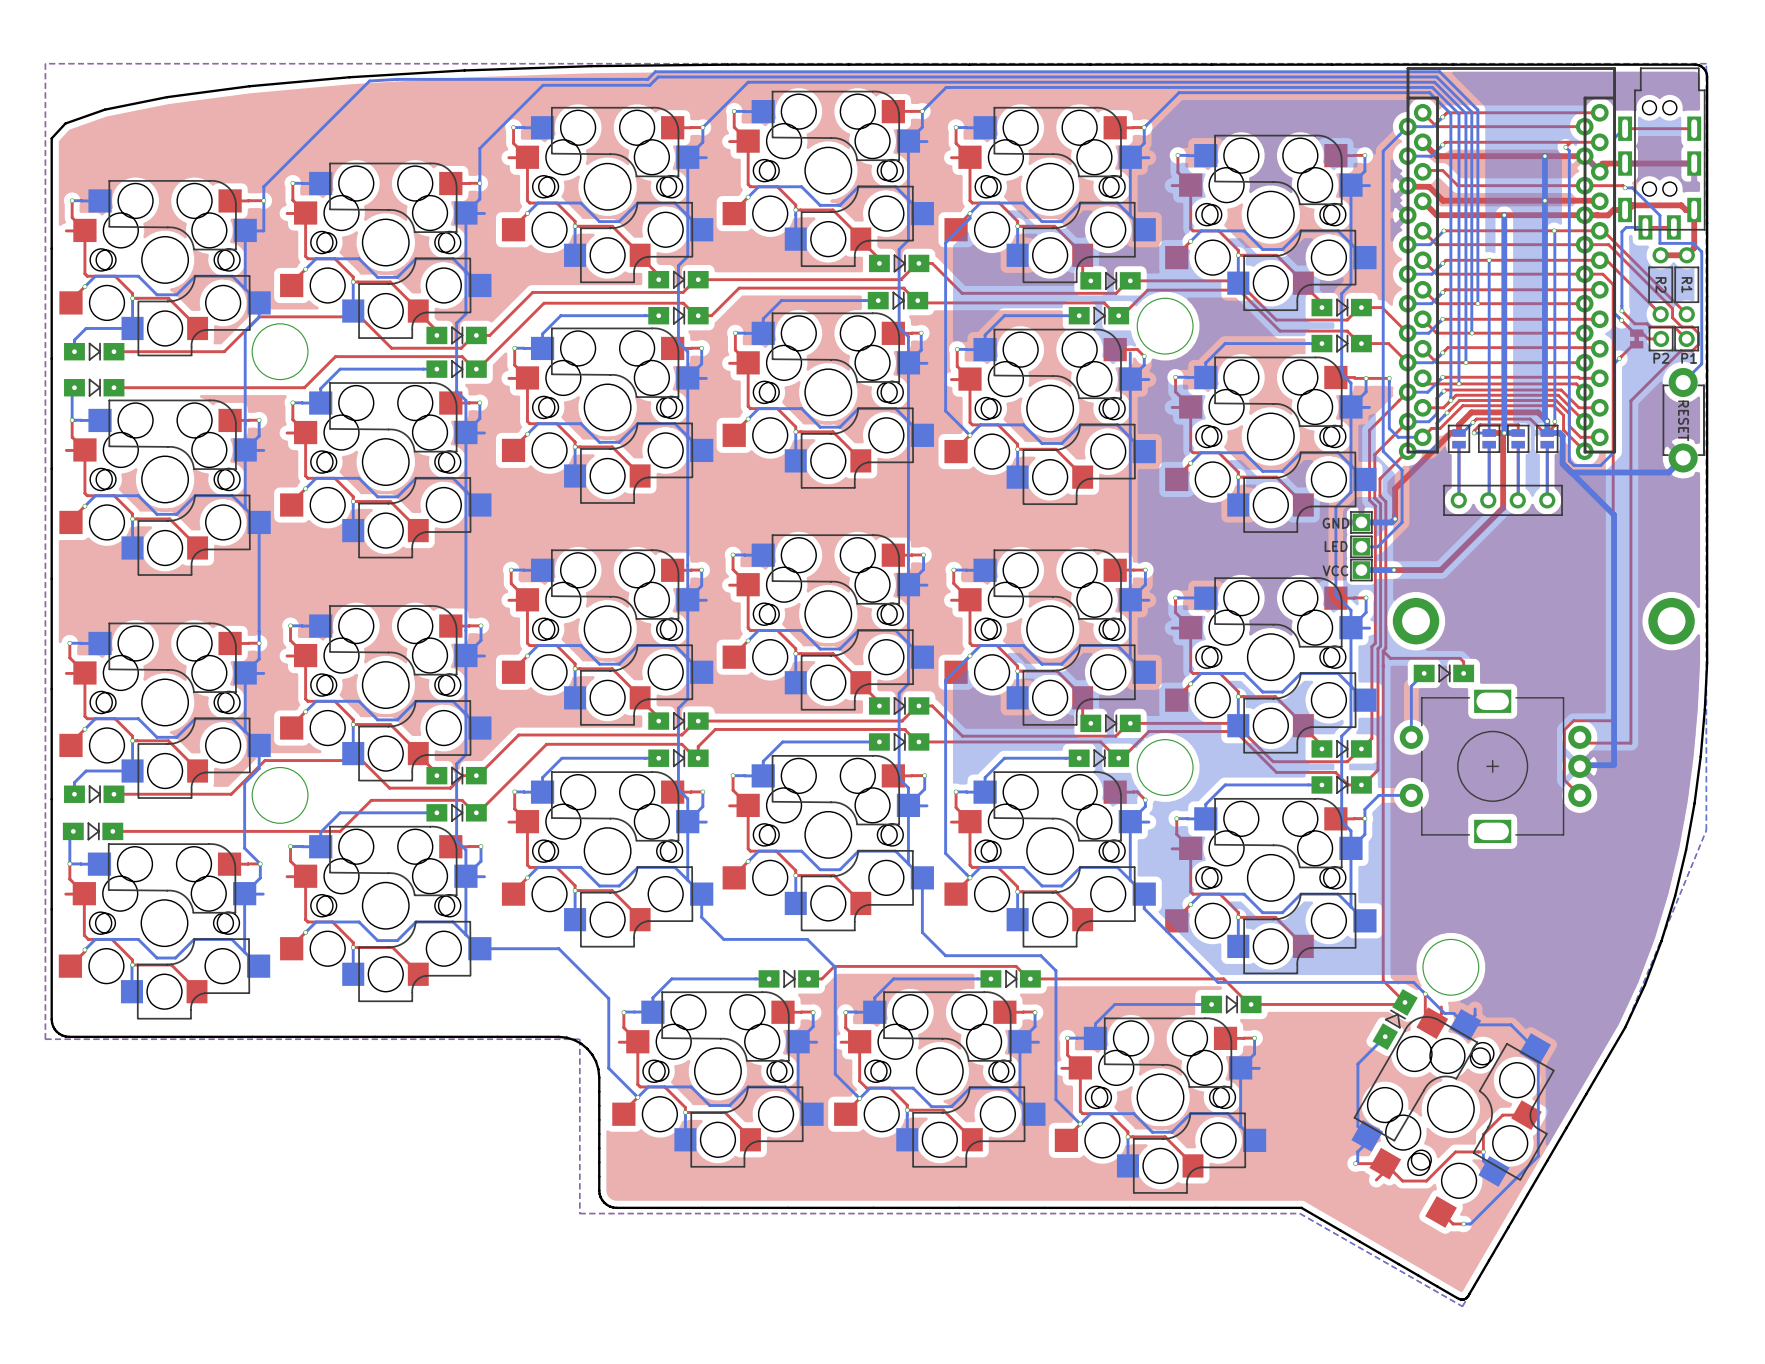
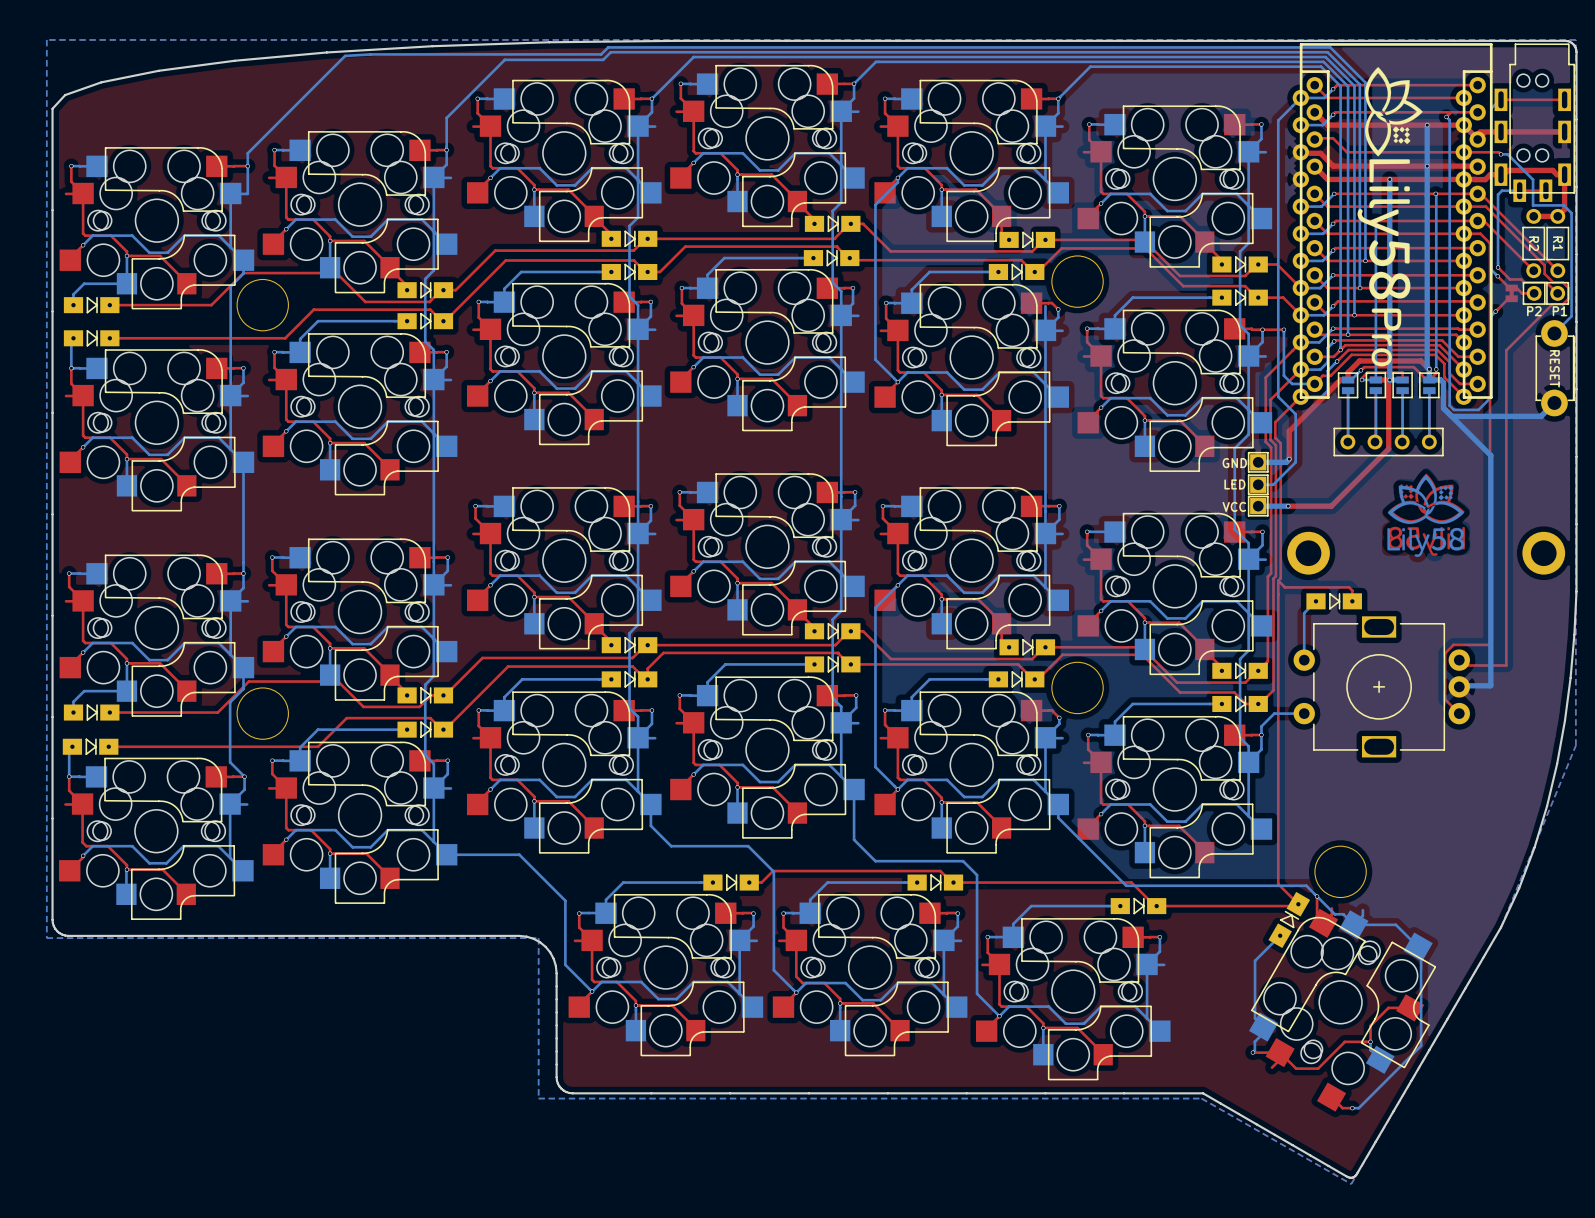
drawing: none -> [1357, 67, 1423, 367]
drawing: none -> [1387, 473, 1465, 557]

